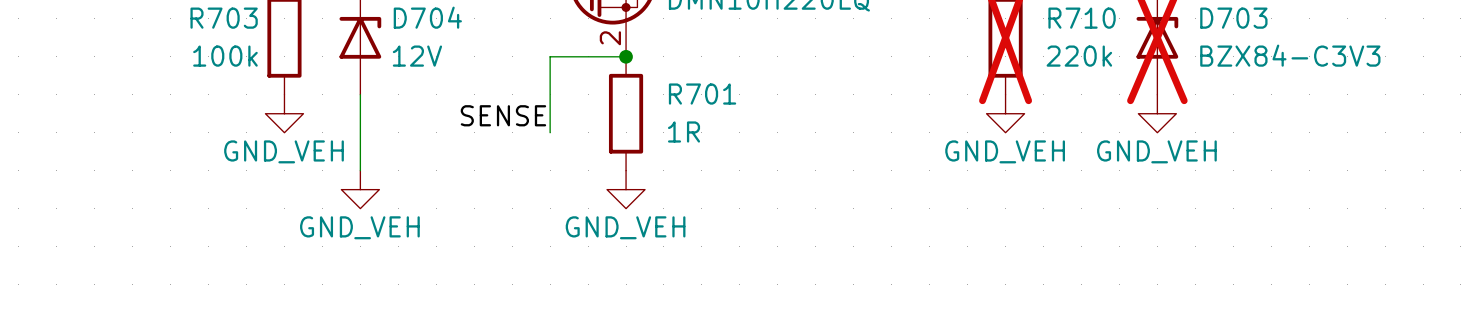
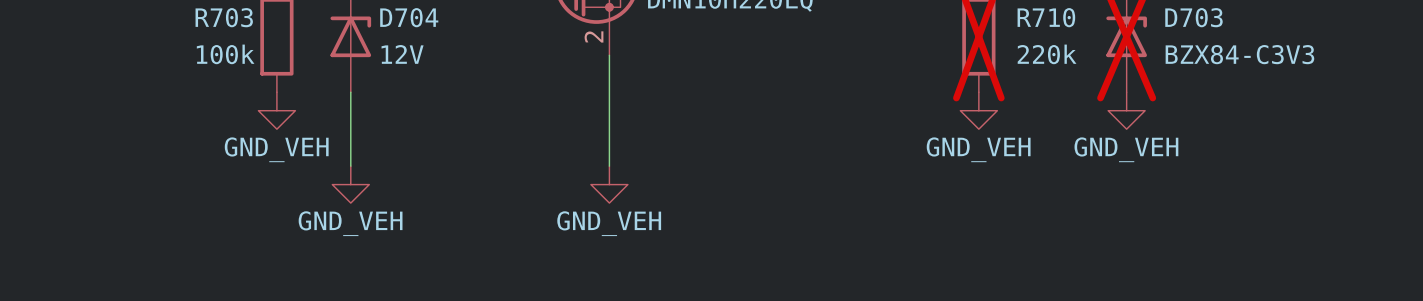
wire: (626, 56) (550, 56) (550, 132) -> (609, 55) (609, 166)
junction: (626, 56) -> none
R701: 1R (626, 113) -> none
label: SENSE (503, 115) -> none

